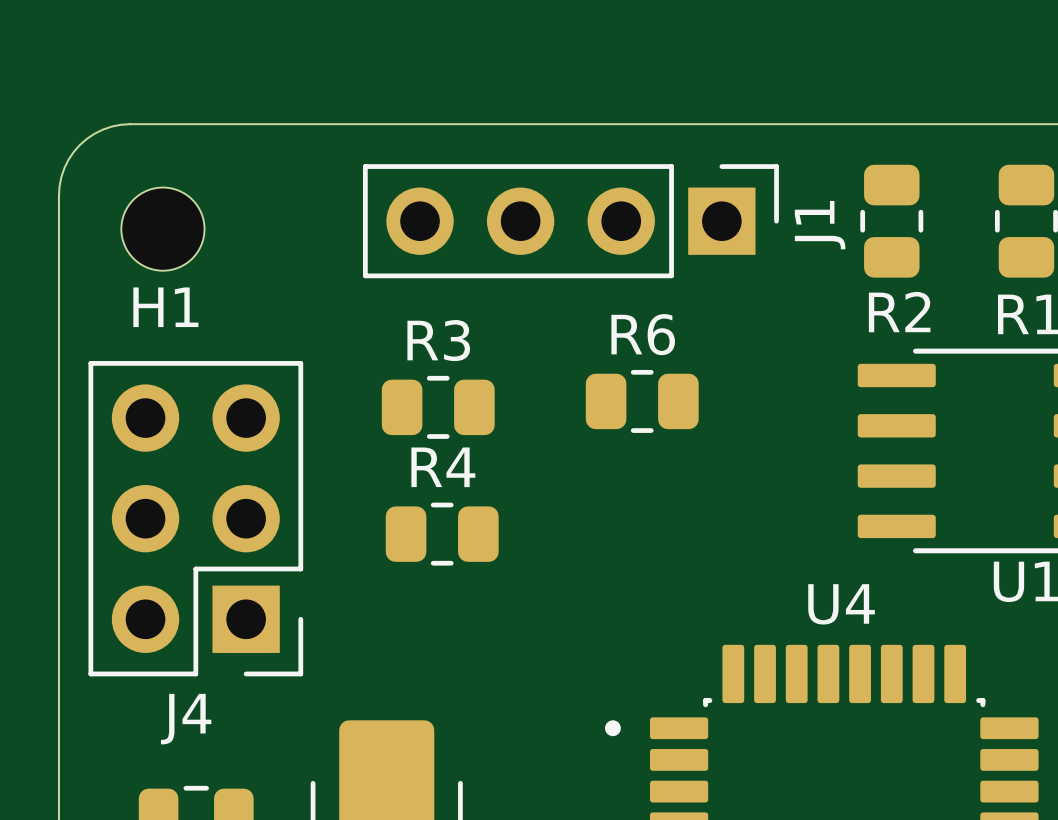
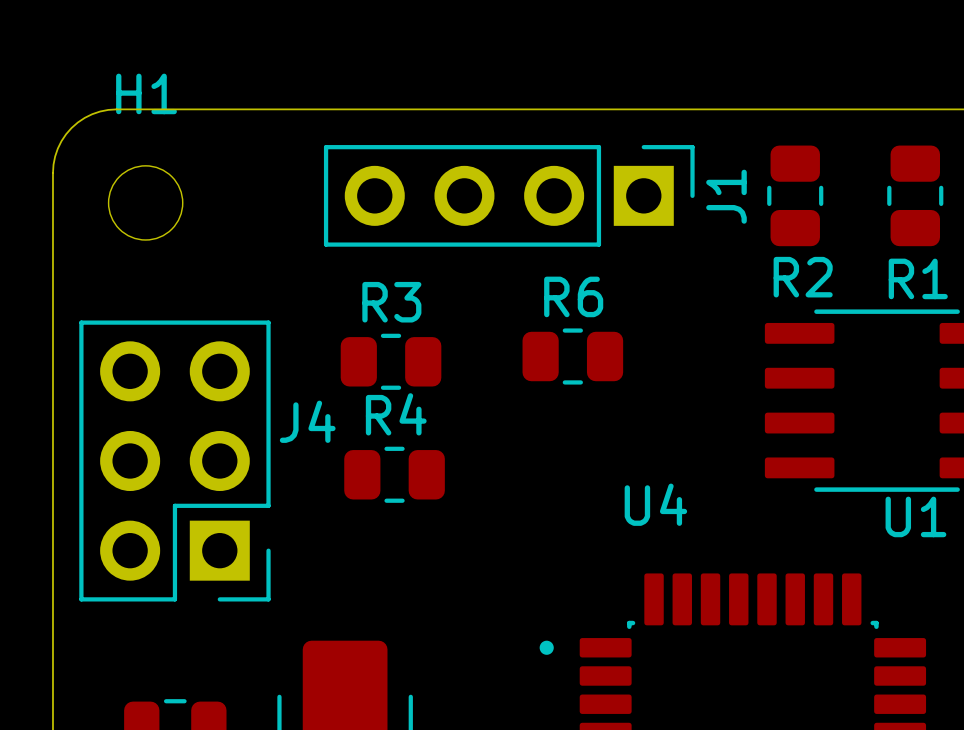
H1 name position: H1 (165, 307) -> H1 (146, 93)
U4 name position: U4 (841, 604) -> U4 (655, 504)
J4 name position: J4 (186, 719) -> J4 (307, 421)

